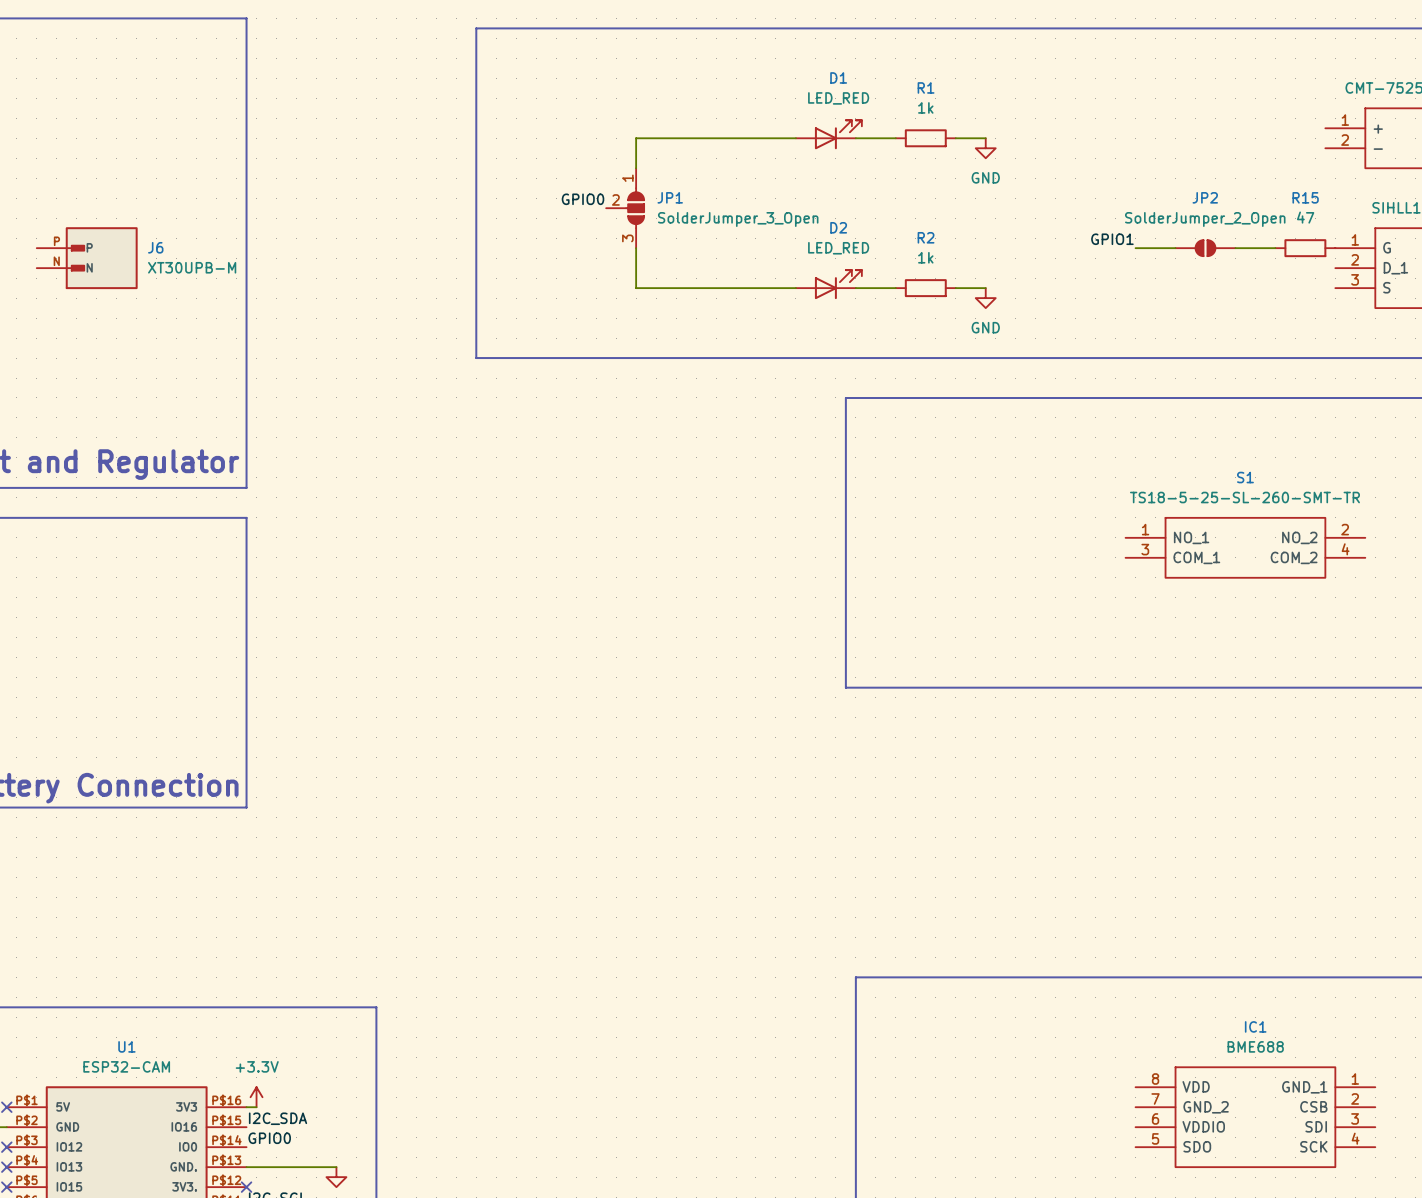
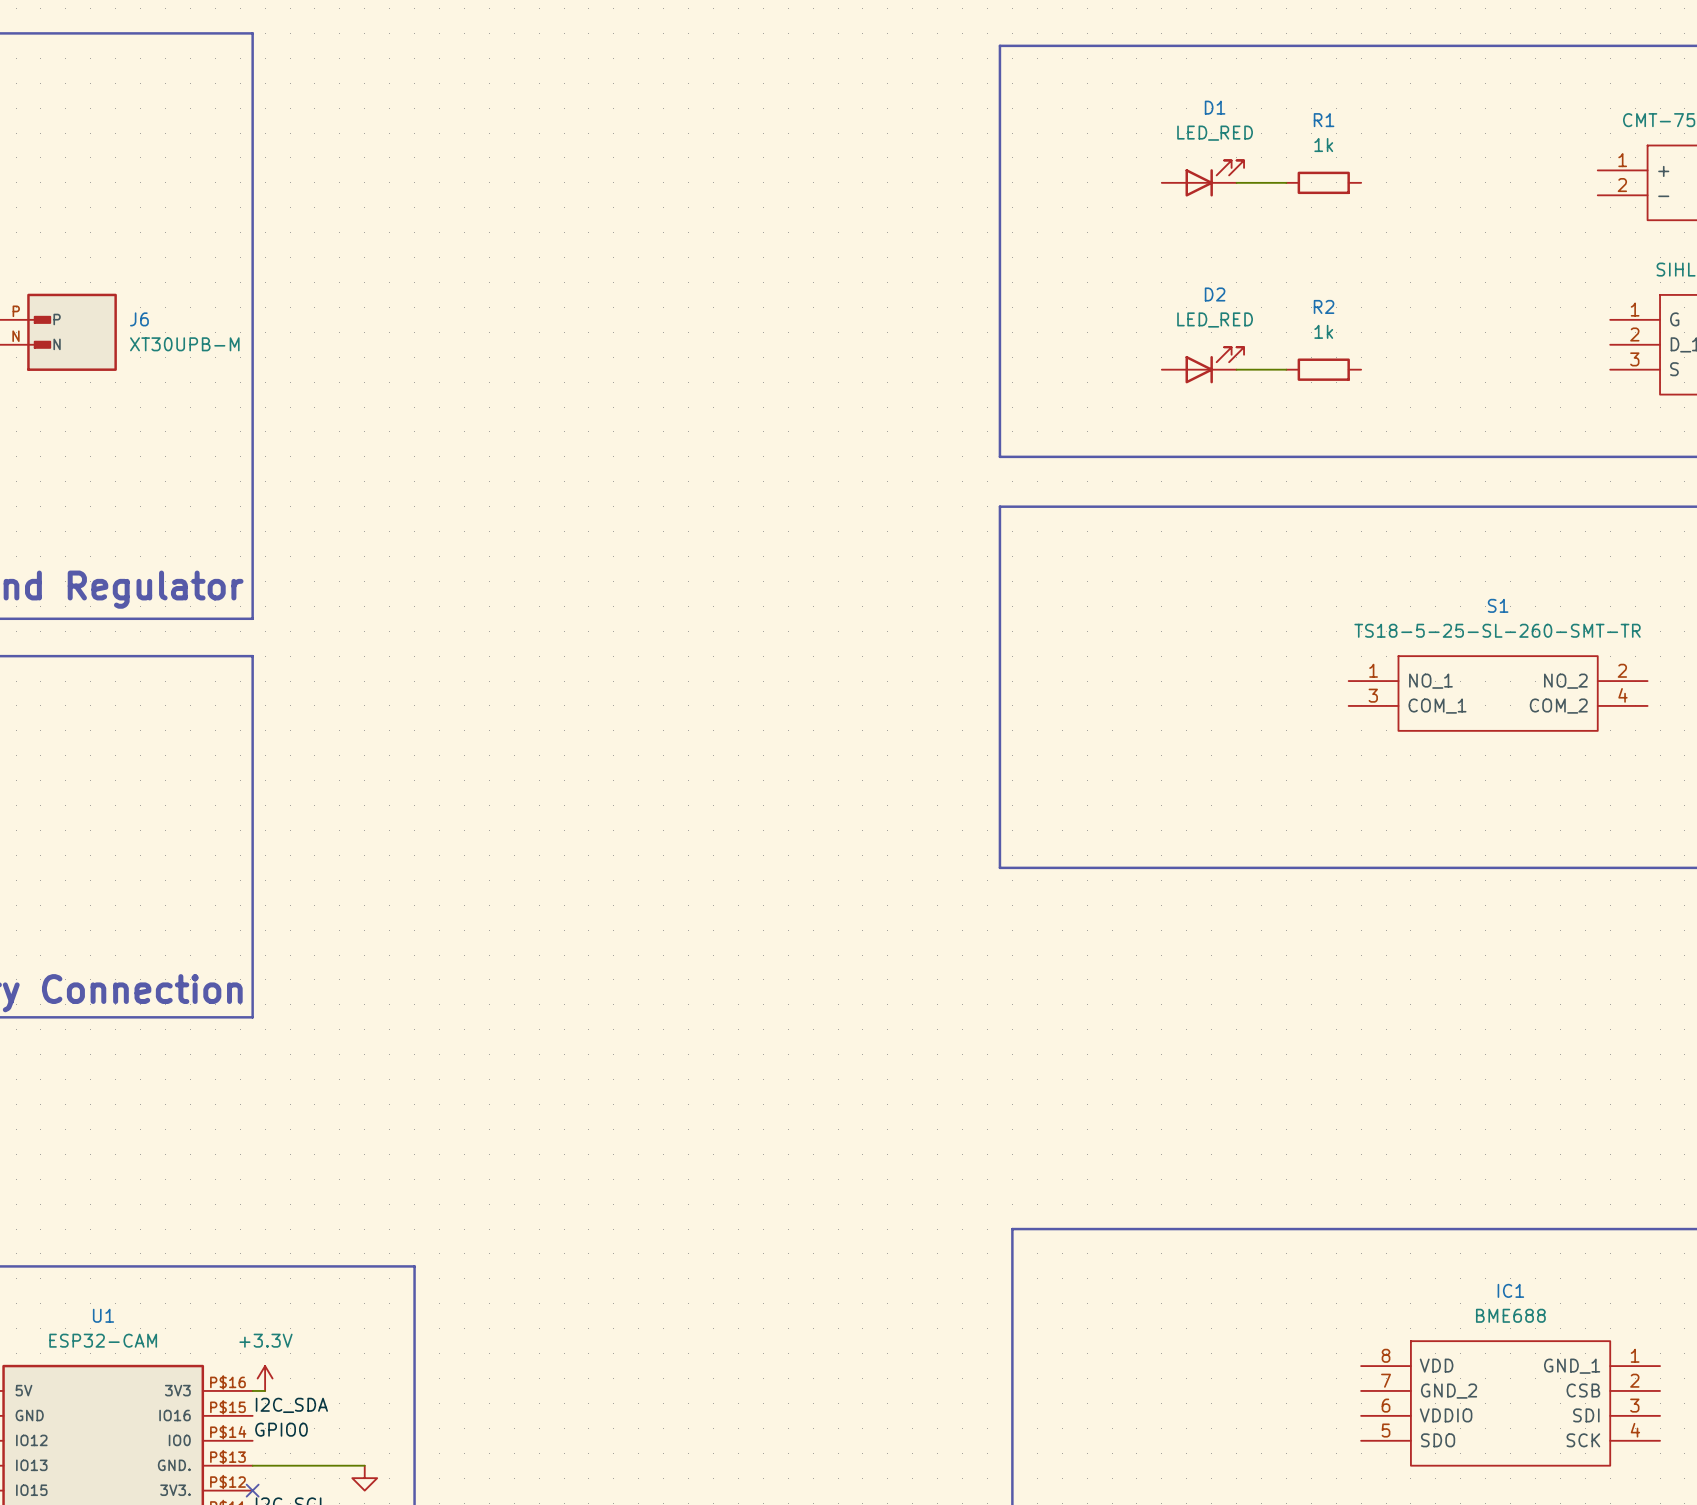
line: (845, 28) (476, 28) (476, 358) (845, 358) -> (999, 45) (999, 456)
D1 position: (828, 134) -> (1202, 178)
wire: (795, 138) (636, 138) (636, 168) -> none
wire: (855, 138) (895, 138) -> (1236, 182) (1286, 182)
R1 position: (925, 138) -> (1323, 182)
wire: (955, 138) (985, 138) -> none
power symbol: GND (985, 148) -> none
label: GPIO0 (583, 199) -> none
JP1: SolderJumper_3_Open (625, 208) -> none
label: GPIO1 (1112, 239) -> none
wire: (636, 248) (636, 288) (795, 288) -> none
wire: (1135, 248) (1175, 248) -> none
JP2: SolderJumper_2_Open (1205, 248) -> none
wire: (1235, 248) (1275, 248) -> none
R15: 47 (1305, 248) -> none
D2 position: (828, 284) -> (1202, 365)
wire: (855, 288) (895, 288) -> (1236, 369) (1286, 369)
R2 position: (925, 288) -> (1323, 369)
wire: (955, 288) (985, 288) -> none
power symbol: GND (985, 298) -> none

